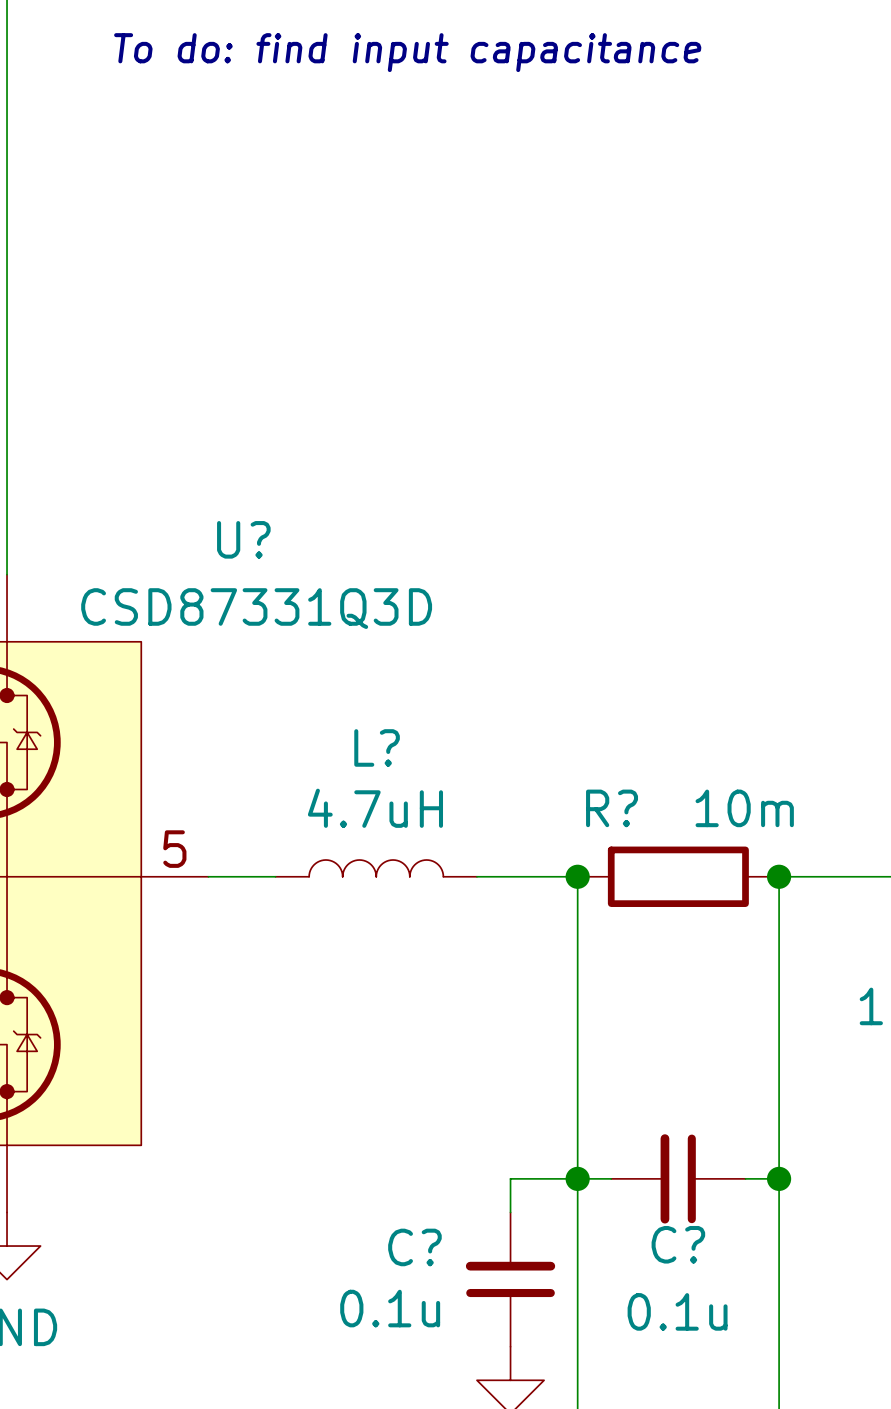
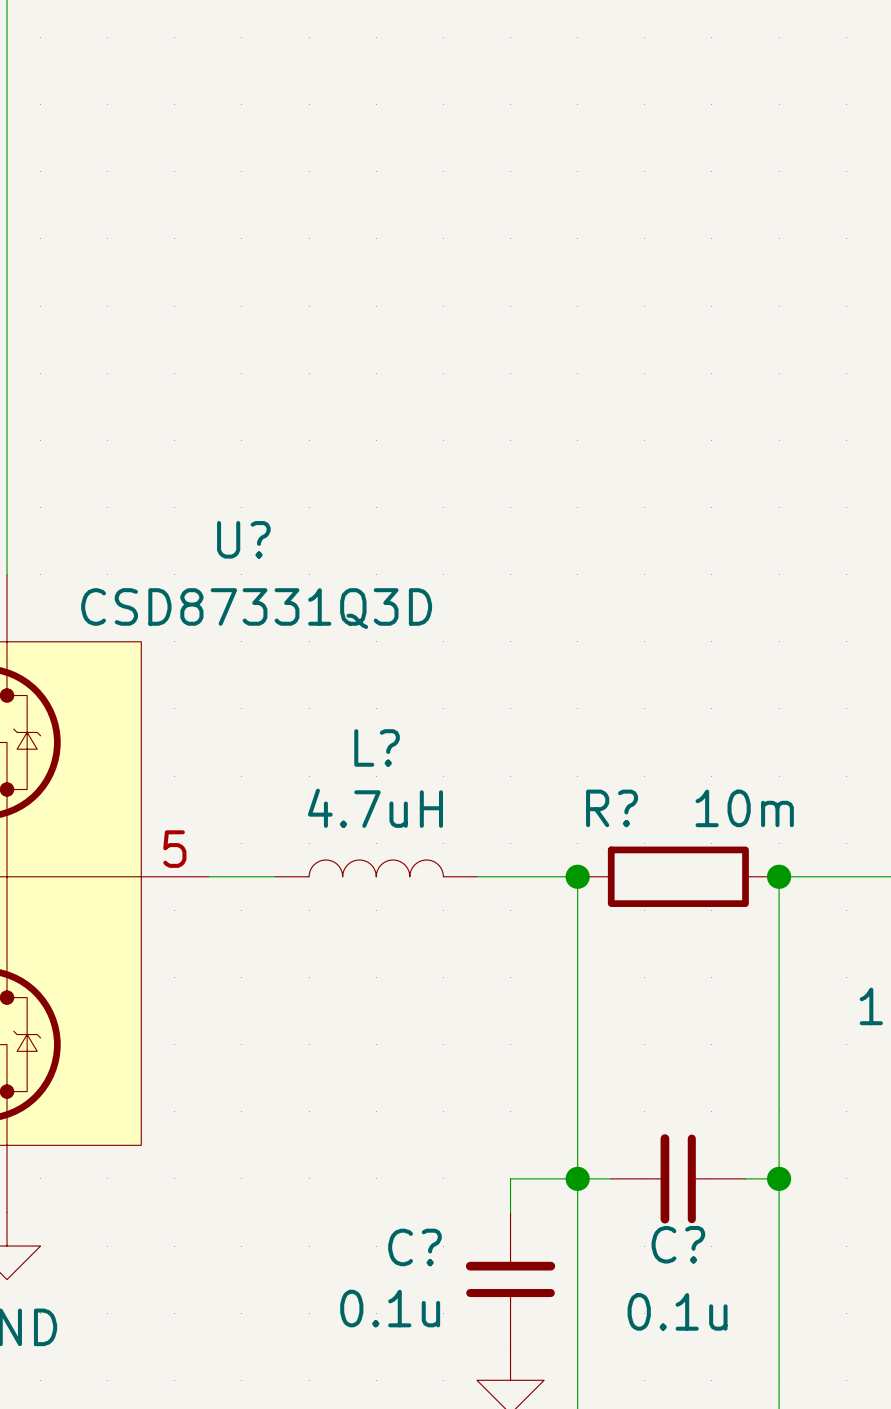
text: To do: find input capacitance (407, 52) -> none

